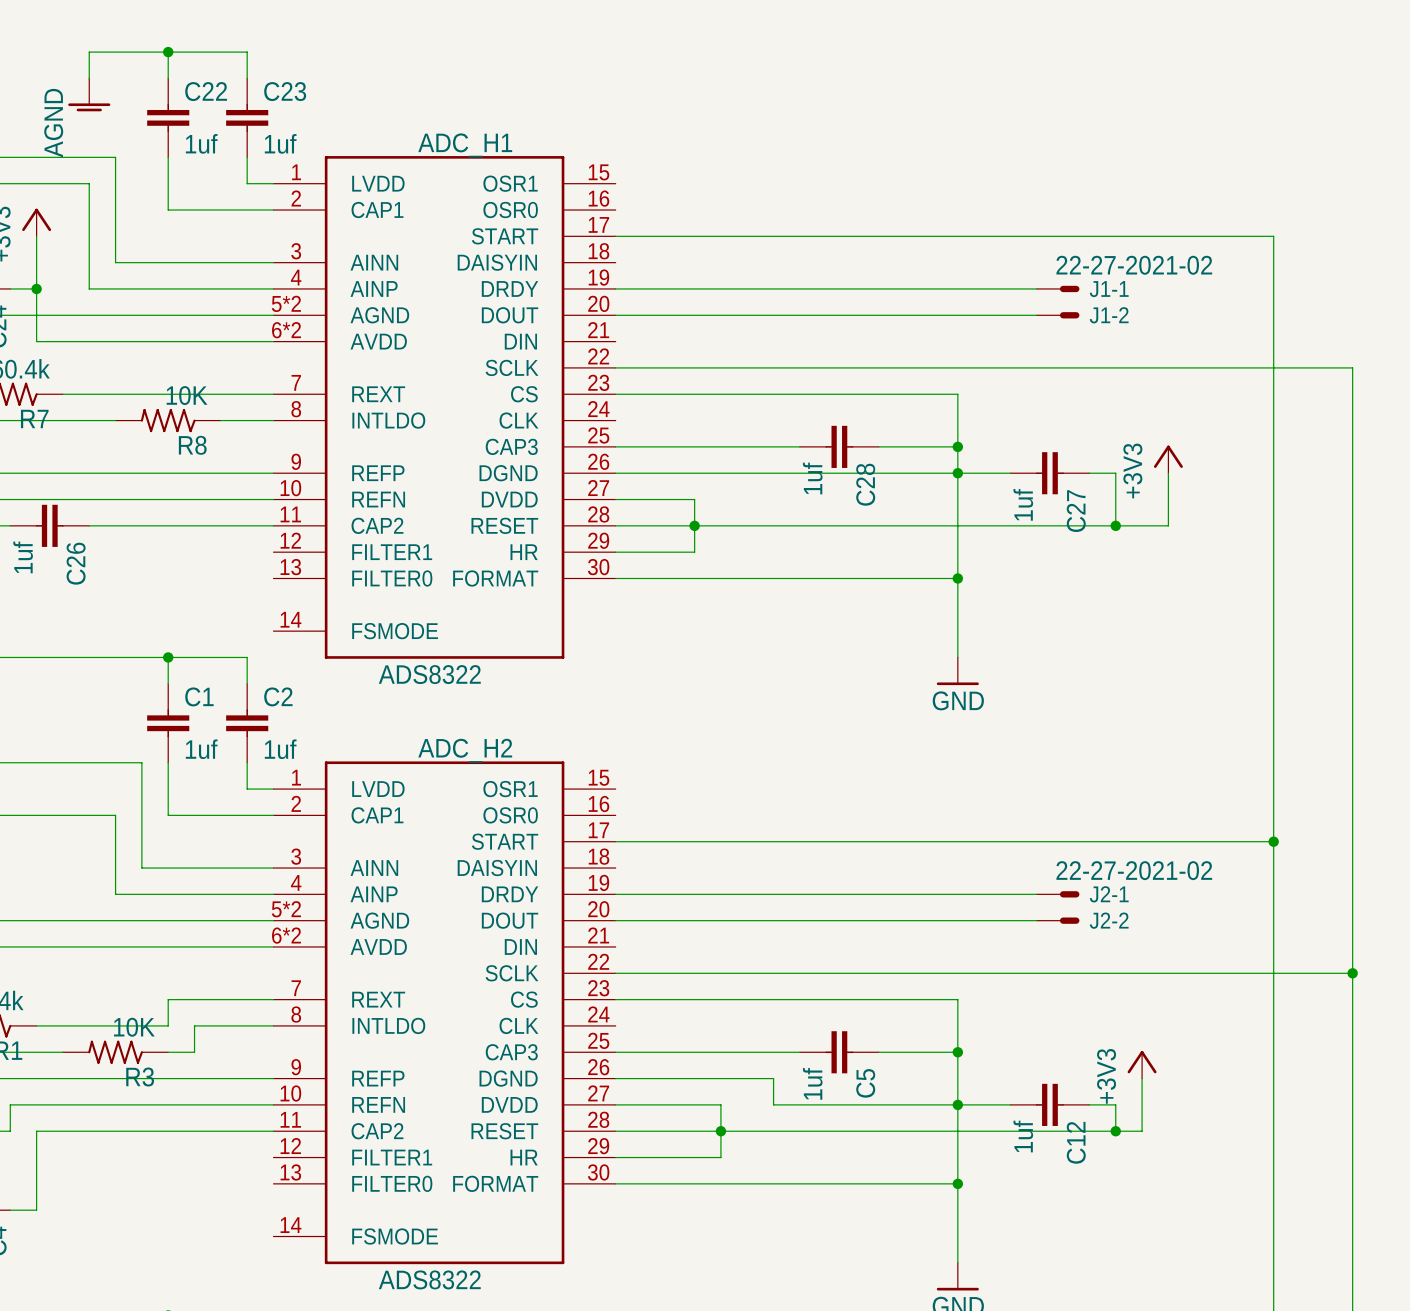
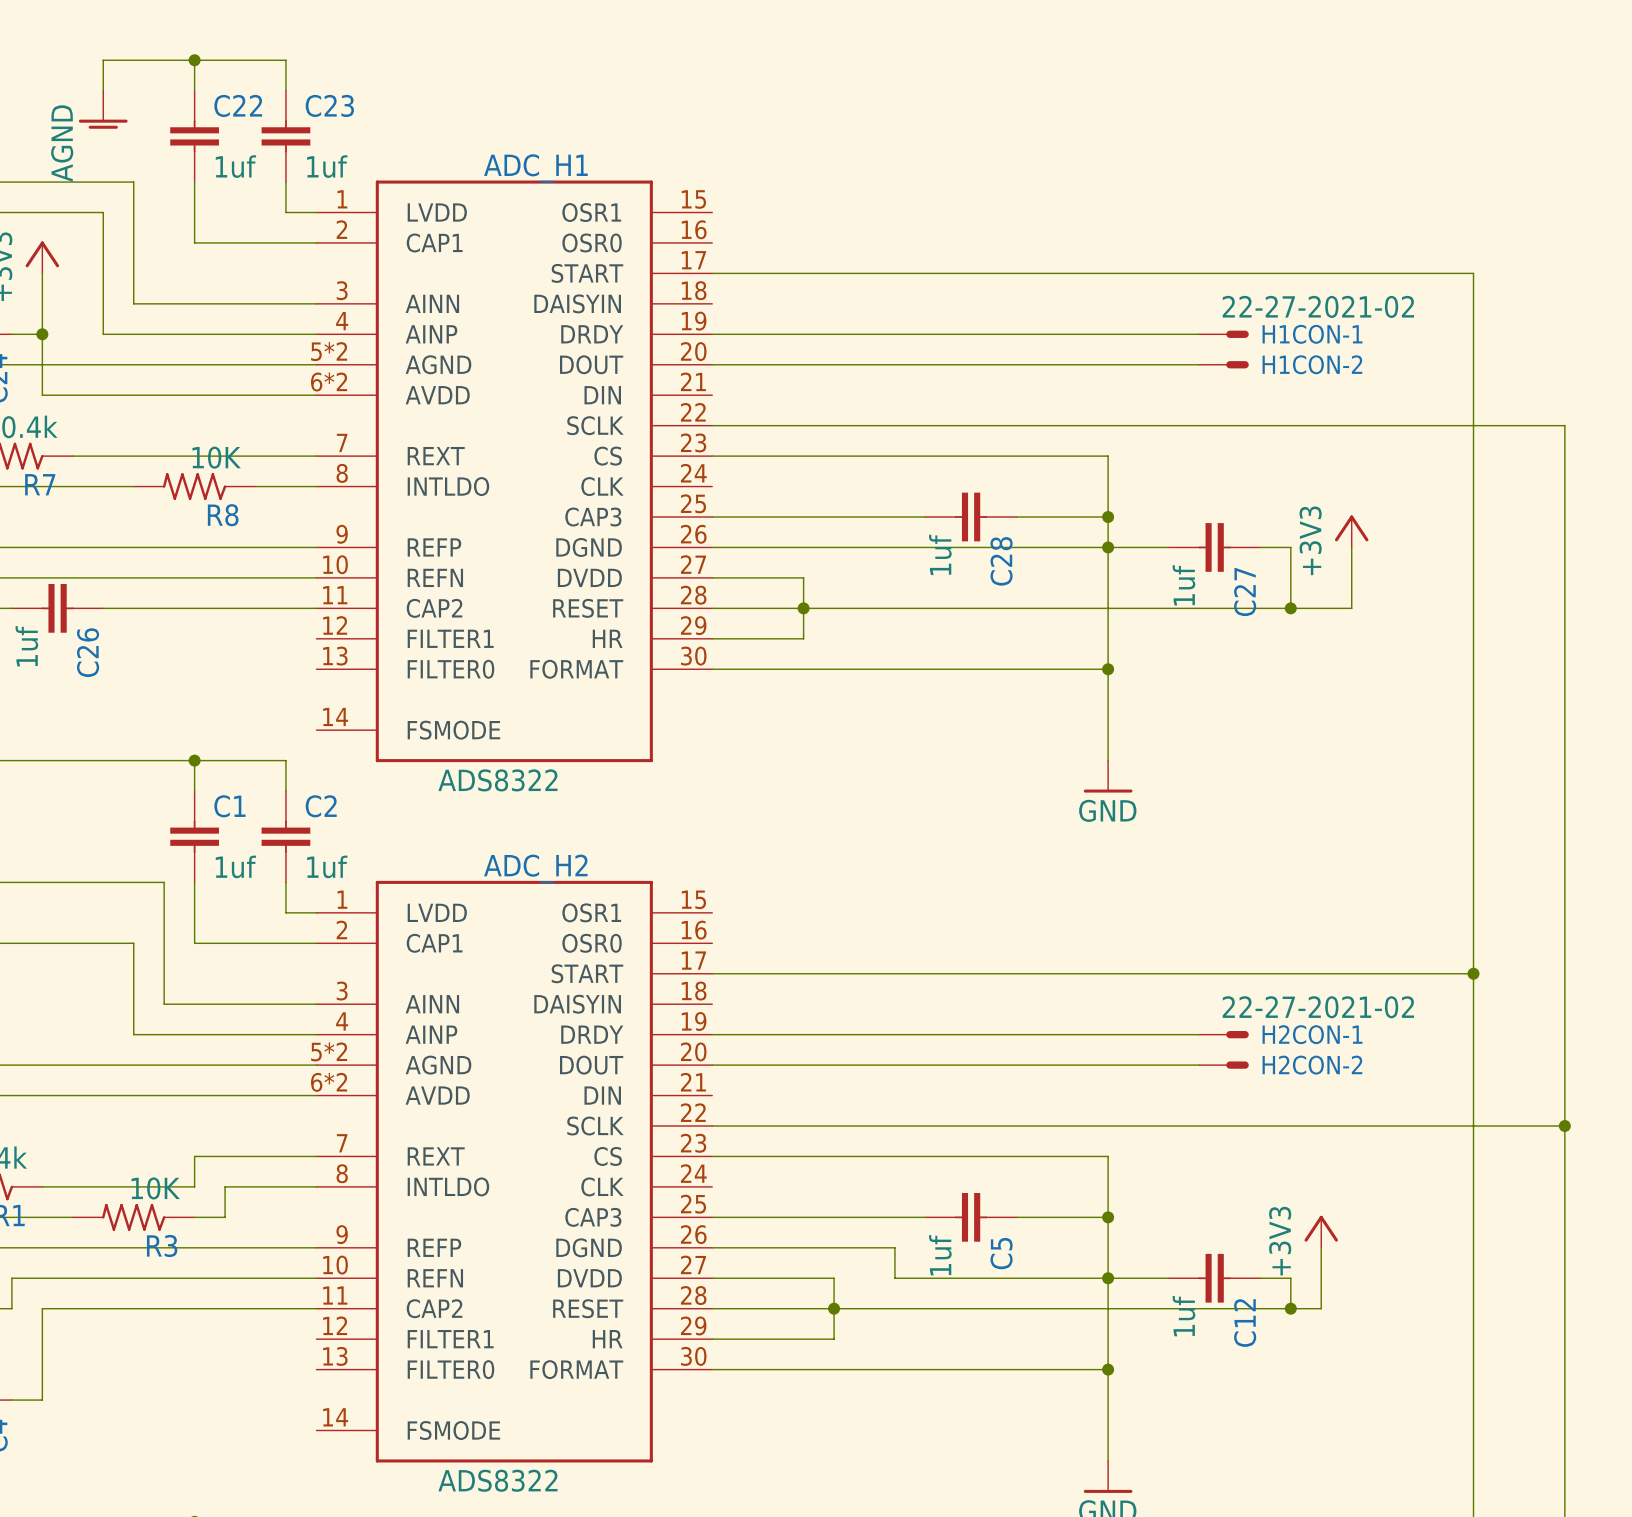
J1-1 name: J1-1 (1109, 289) -> H1CON-1 (1312, 334)
J1-2 name: J1-2 (1109, 315) -> H1CON-2 (1312, 364)
J2-1 name: J2-1 (1109, 894) -> H2CON-1 (1312, 1034)
J2-2 name: J2-2 (1109, 920) -> H2CON-2 (1312, 1065)

